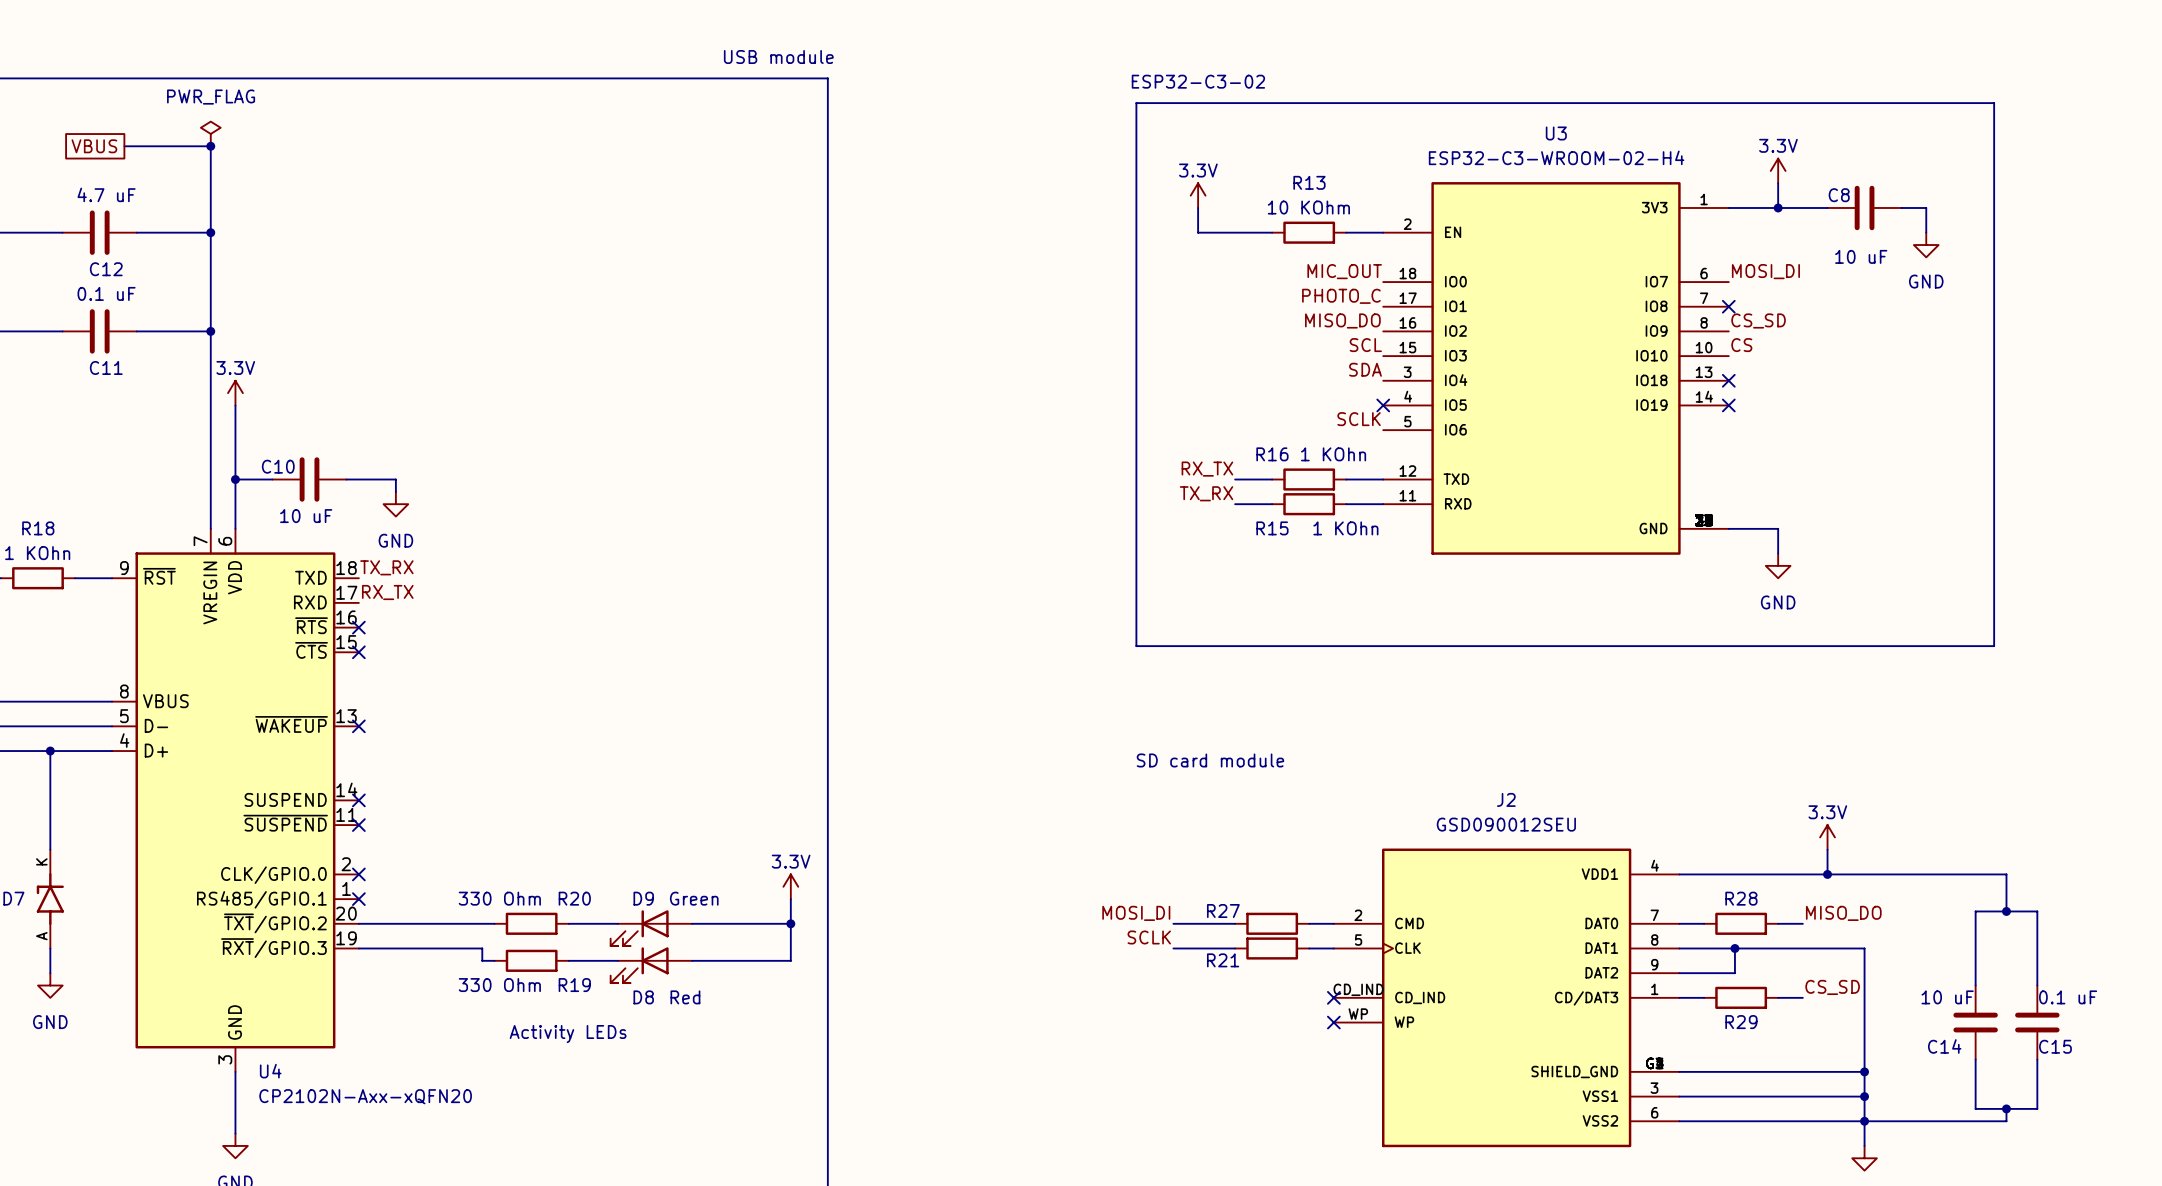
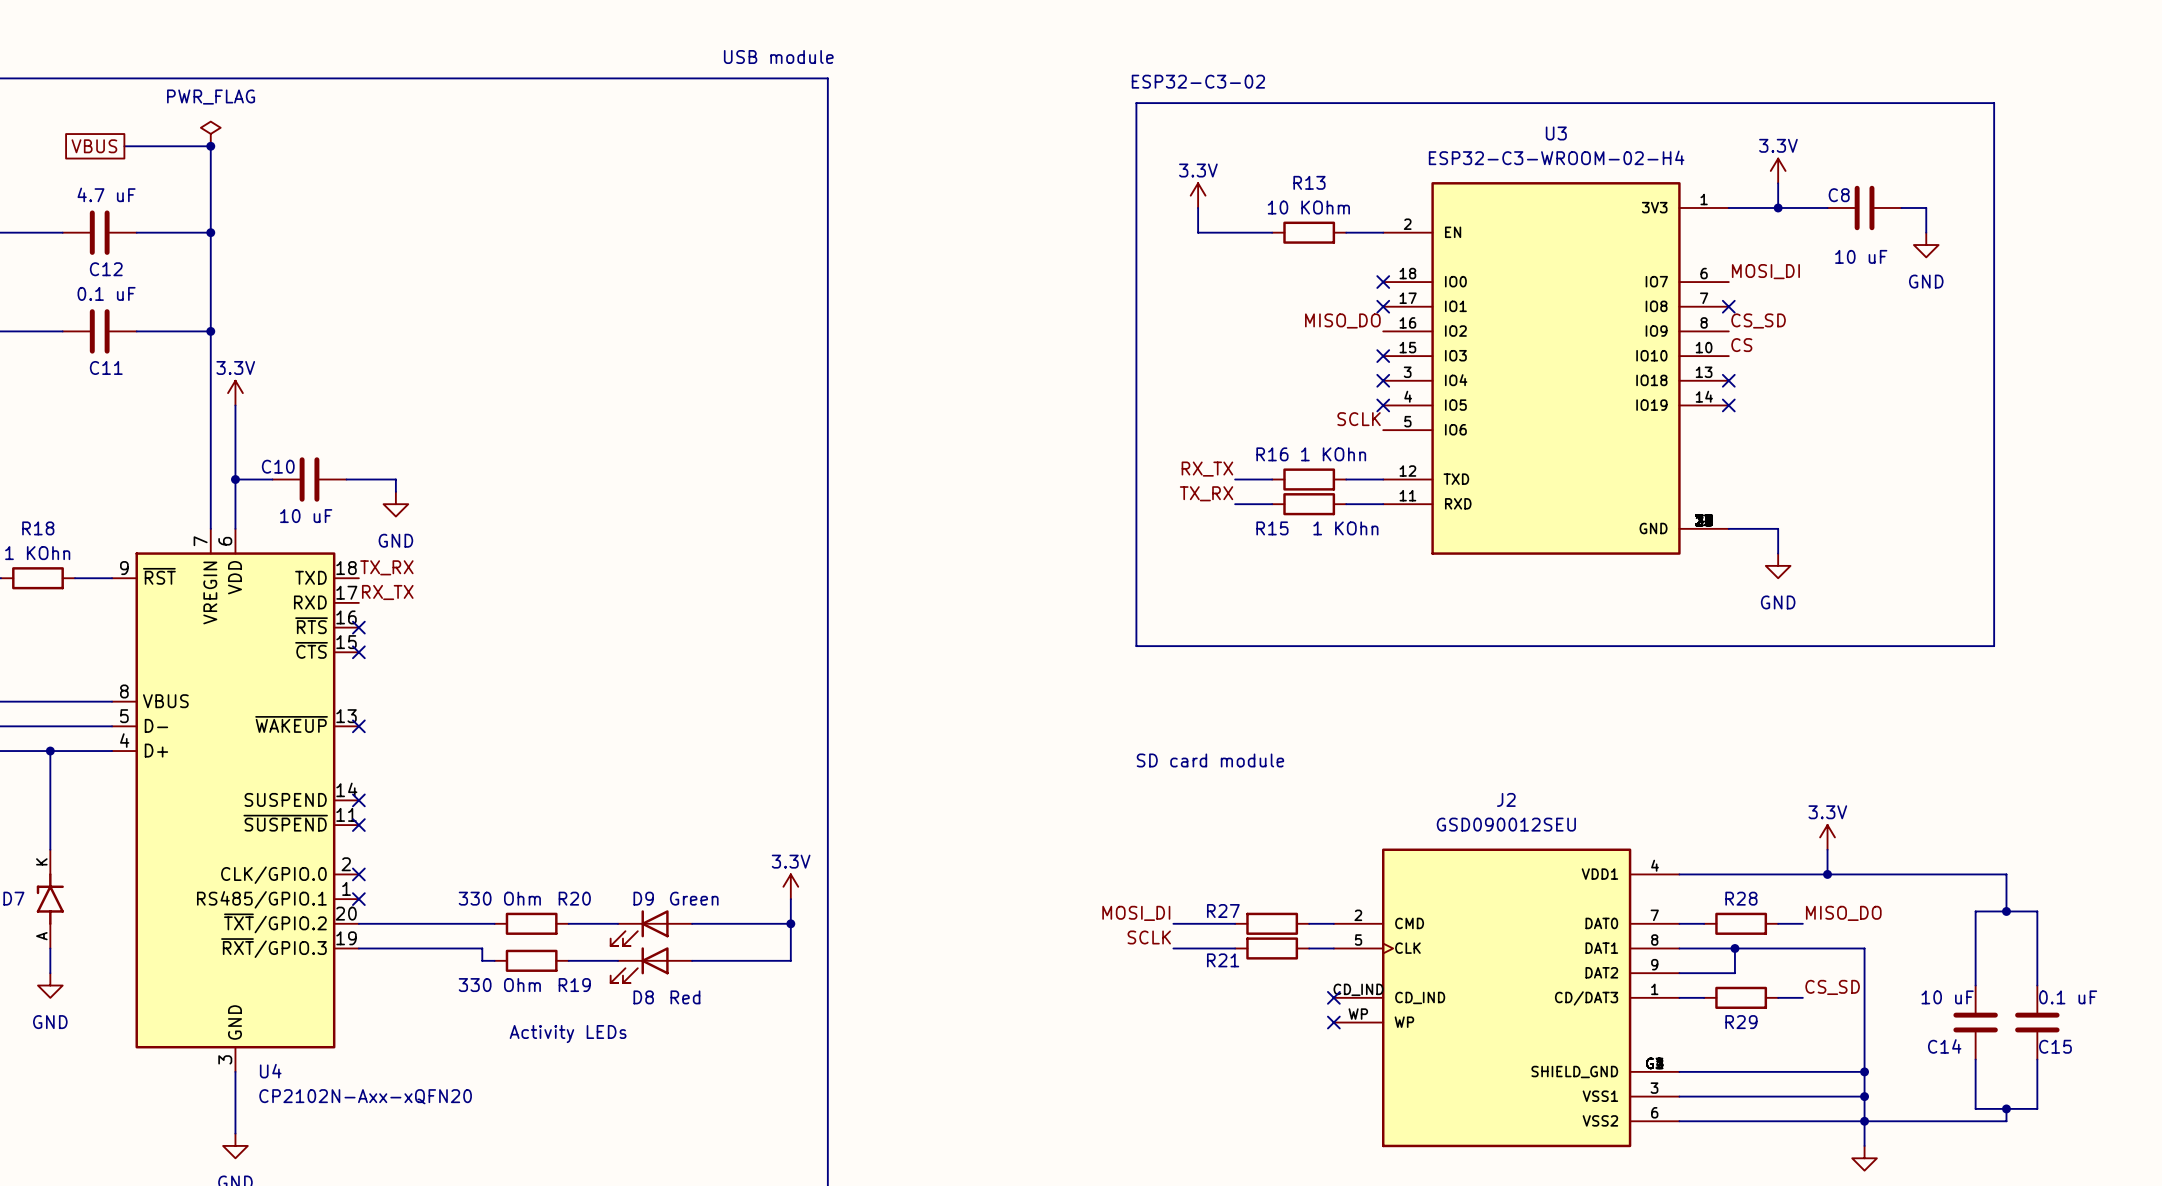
label: MIC_OUT (1344, 271) -> none
no-connect mark: none -> (1383, 282)
label: PHOTO_C (1341, 296) -> none
no-connect mark: none -> (1383, 306)
label: SCL (1365, 345) -> none
no-connect mark: none -> (1383, 356)
label: SDA (1365, 369) -> none
no-connect mark: none -> (1383, 380)

